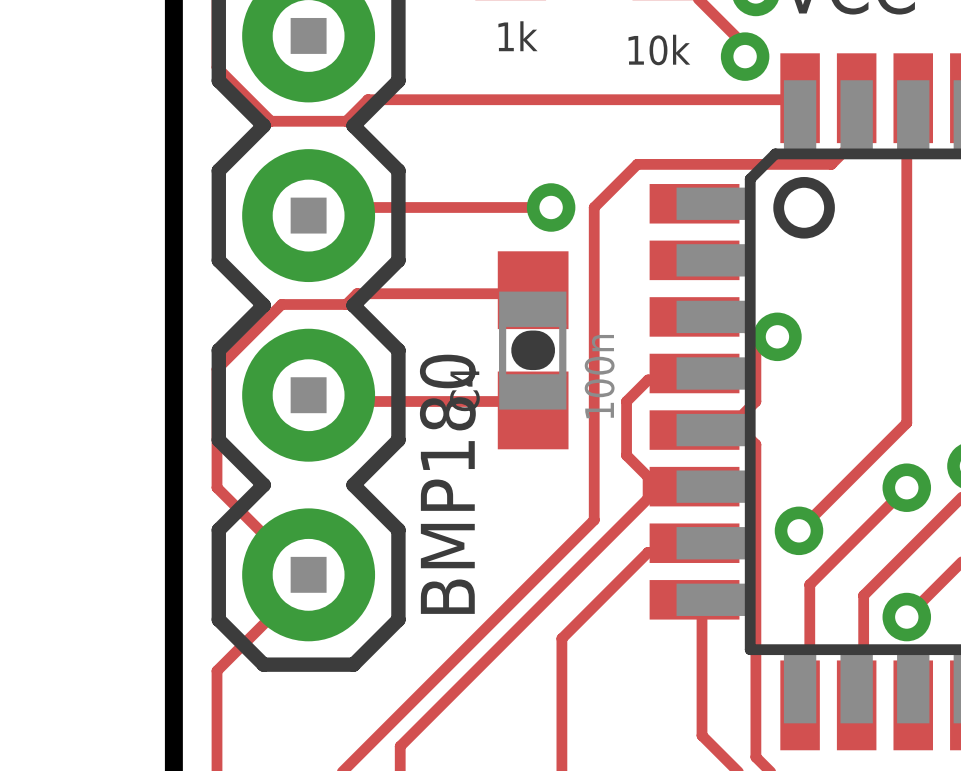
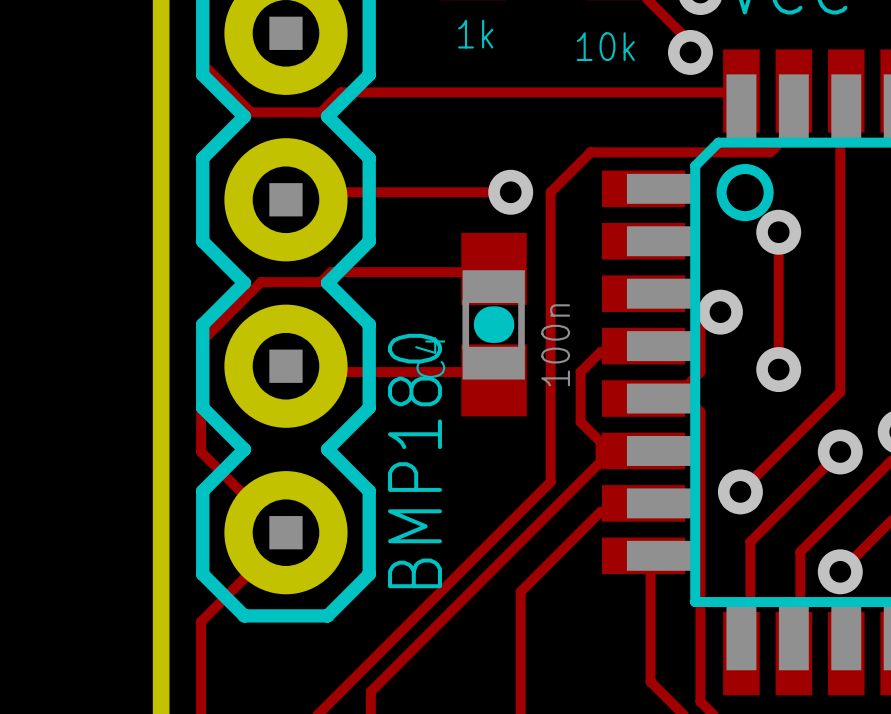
track: none -> (778, 232) (778, 369)
via: none -> (778, 232)
via: none -> (778, 369)

